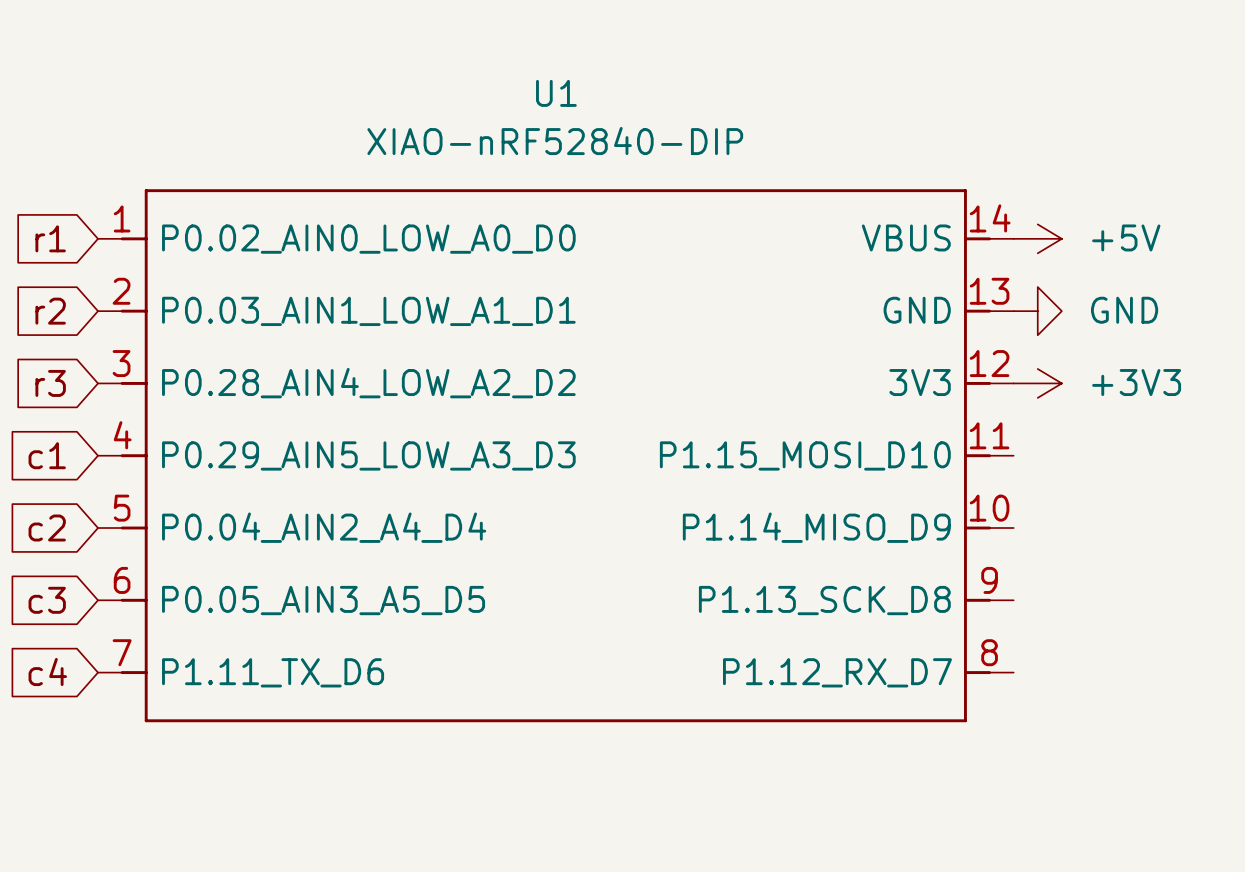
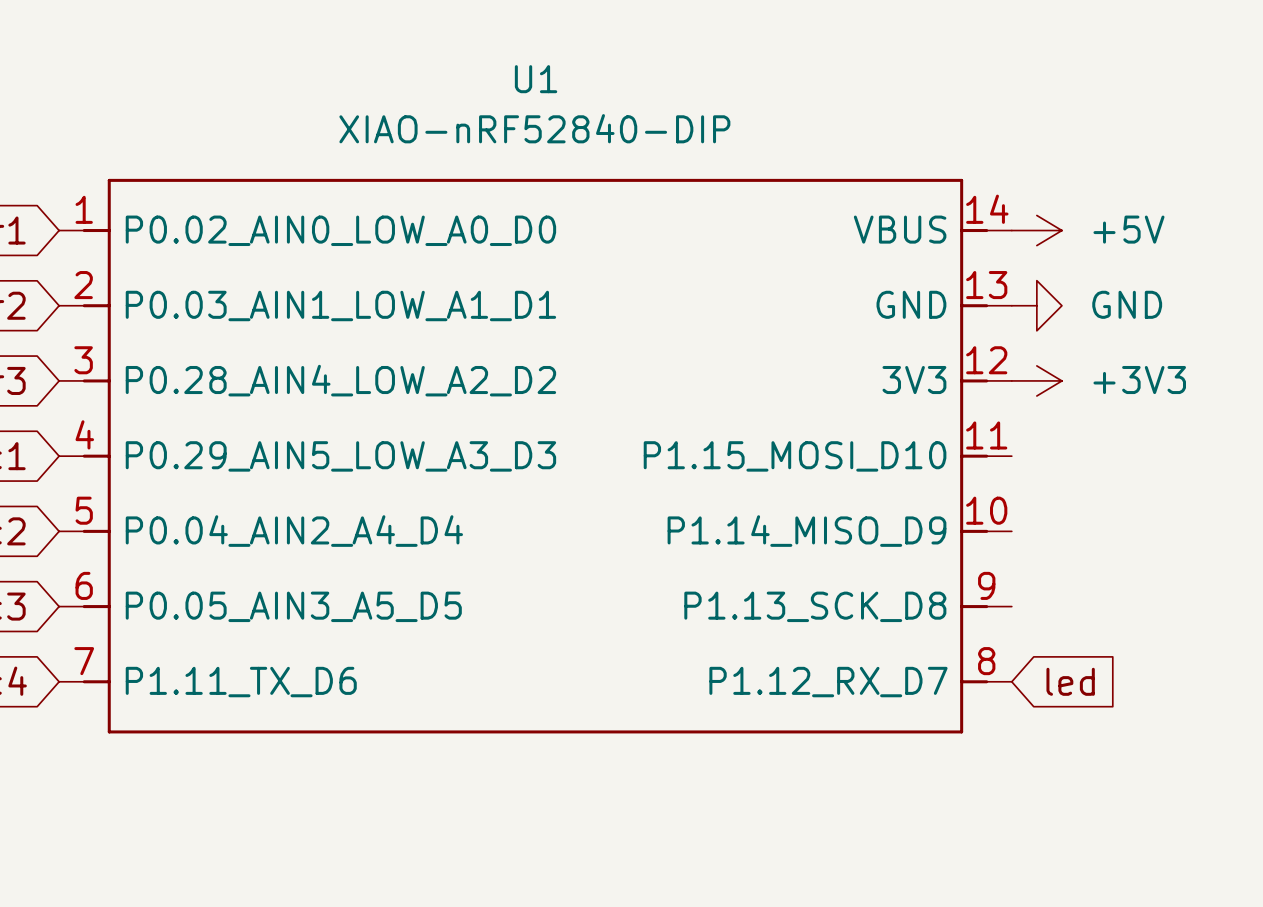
global label: none -> led (1070, 681)

